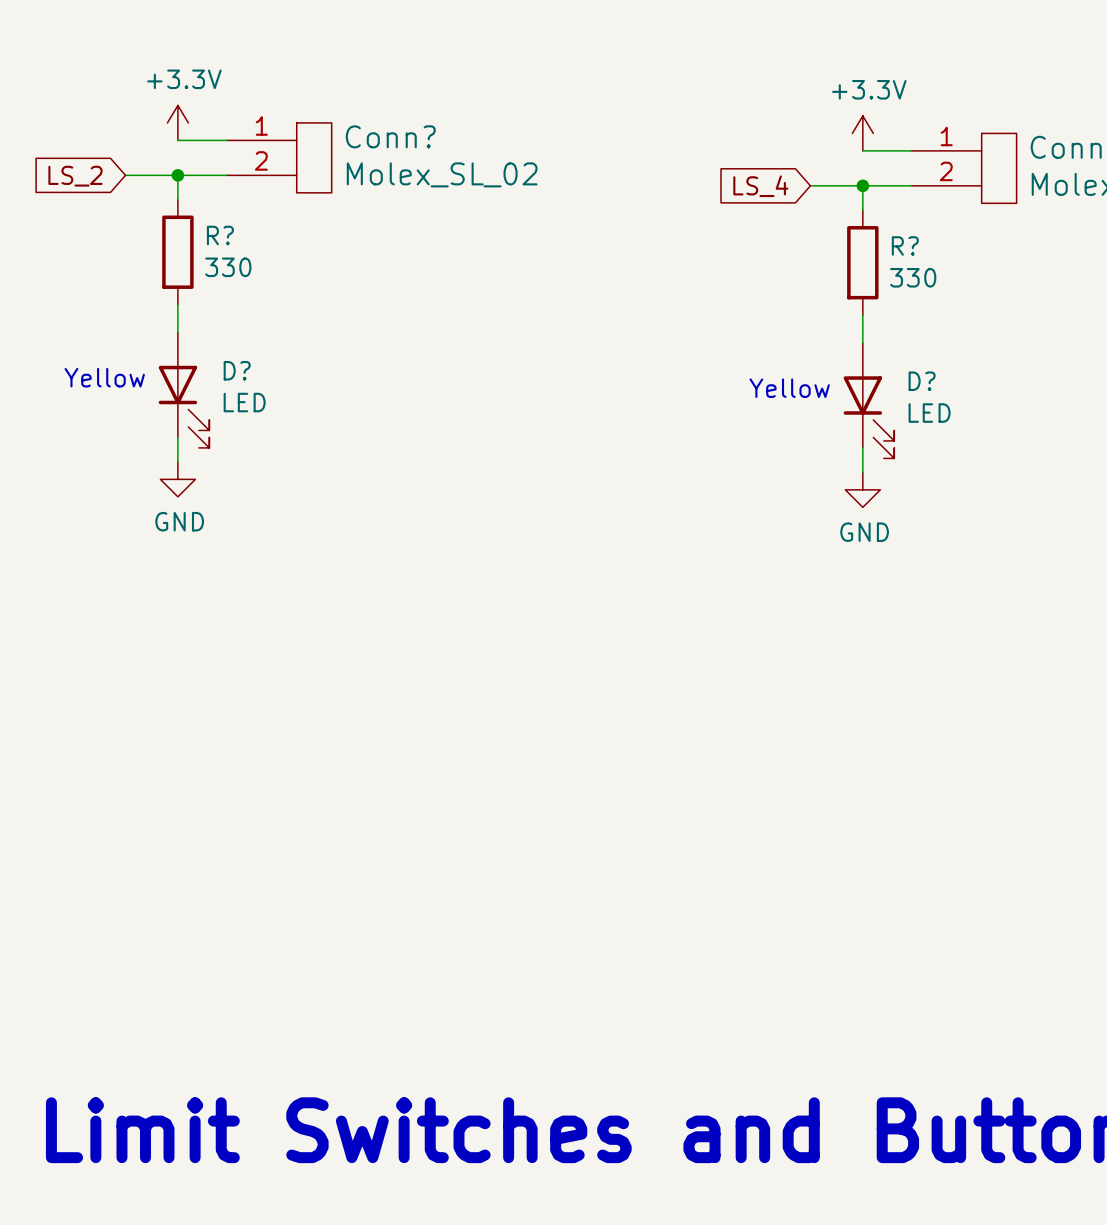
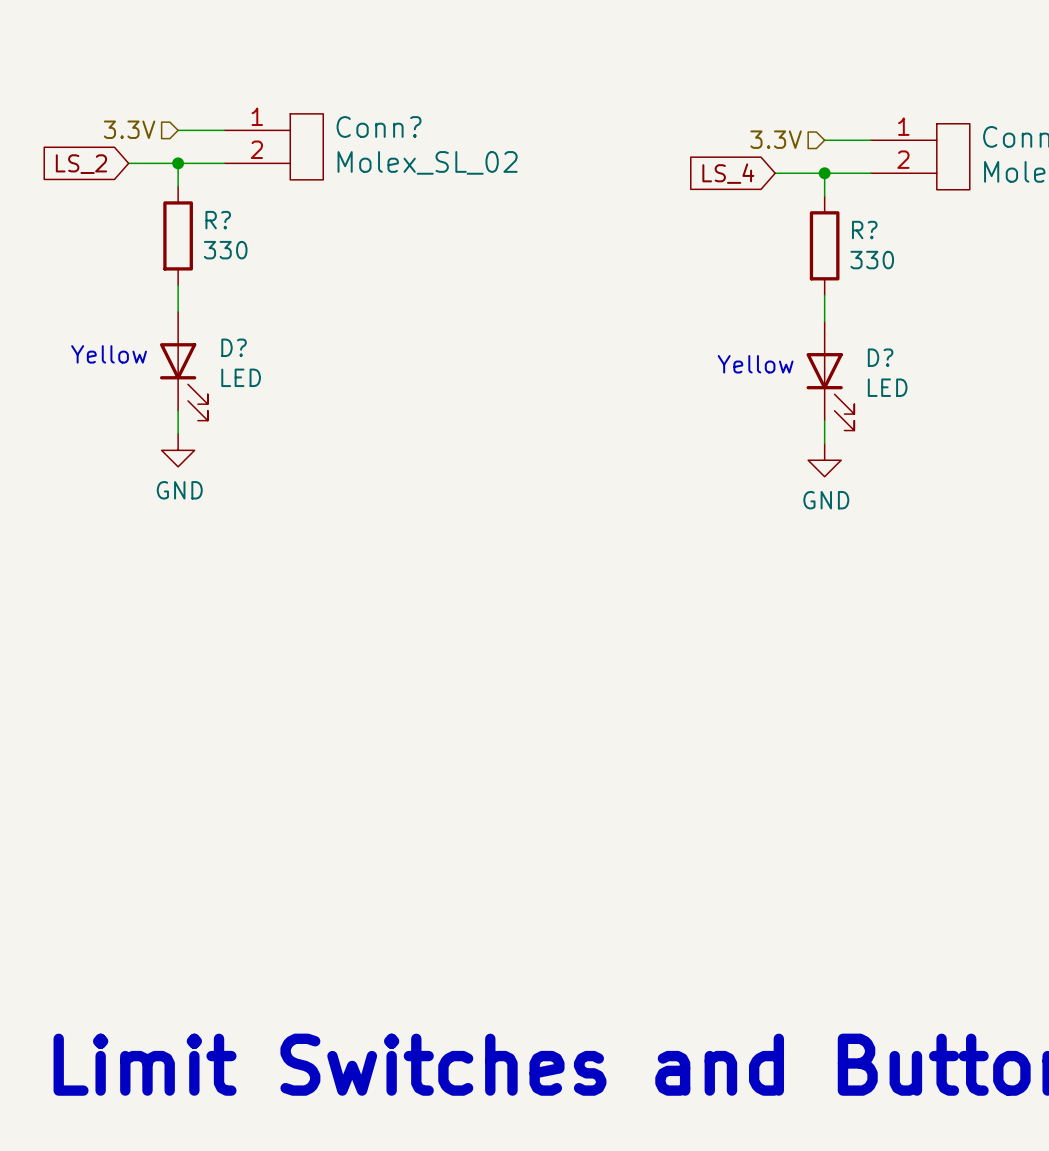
power symbol: +3.3V (177, 122) -> none
power symbol: +3.3V (862, 133) -> none
hierarchical label: none -> 3.3V (129, 129)
hierarchical label: none -> 3.3V (776, 139)

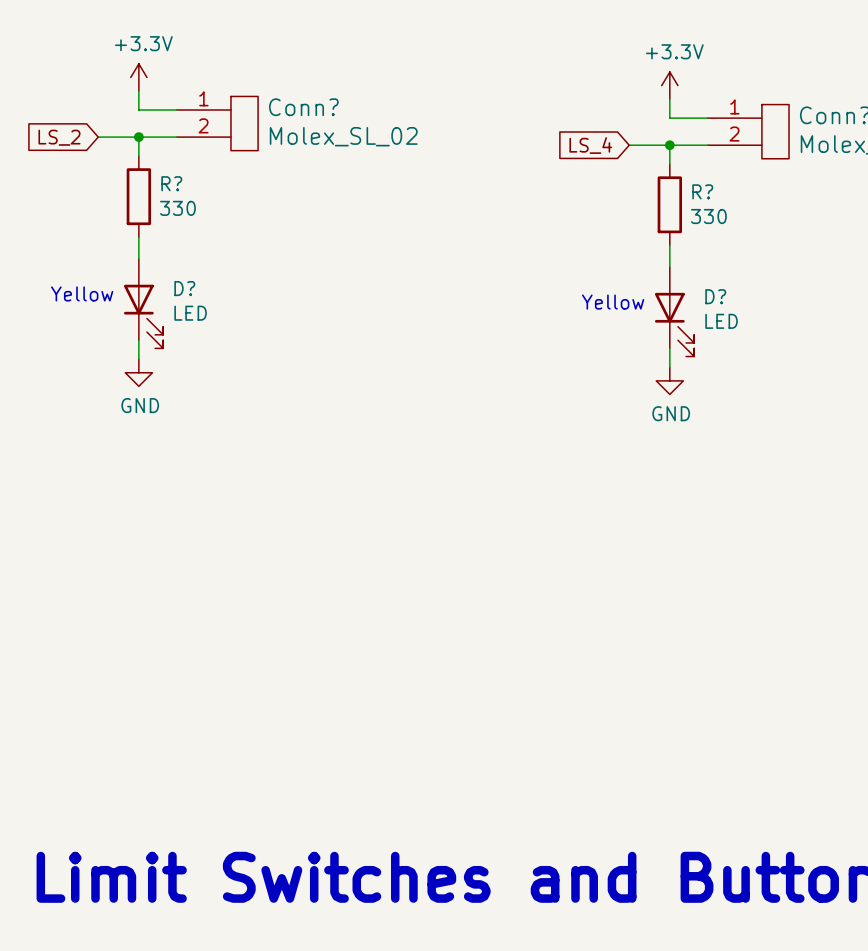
power symbol: none -> +3.3V (138, 77)
power symbol: none -> +3.3V (669, 85)
wire: none -> (138, 91) (138, 110)
wire: none -> (669, 99) (669, 118)
hierarchical label: 3.3V (129, 129) -> none
hierarchical label: 3.3V (776, 139) -> none

